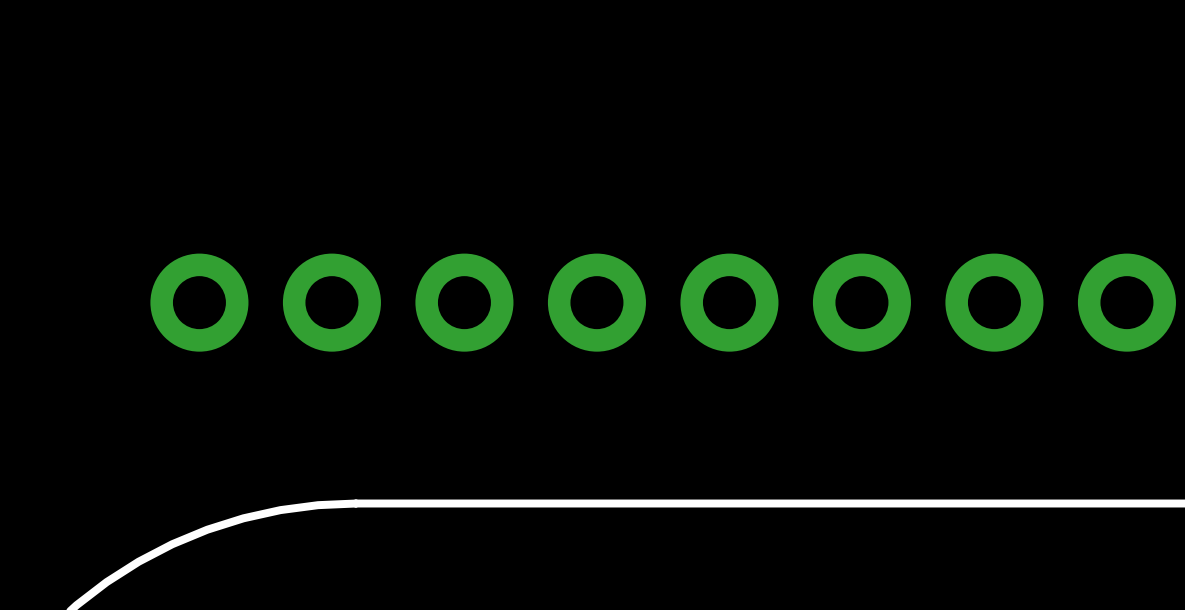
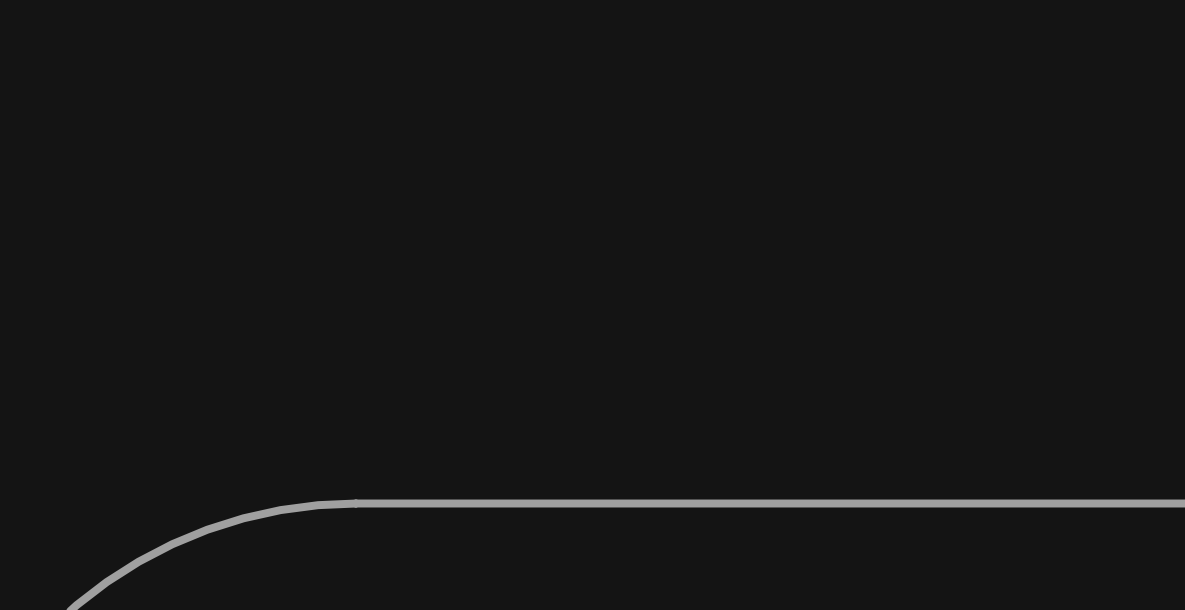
part: (663, 302) -> none

